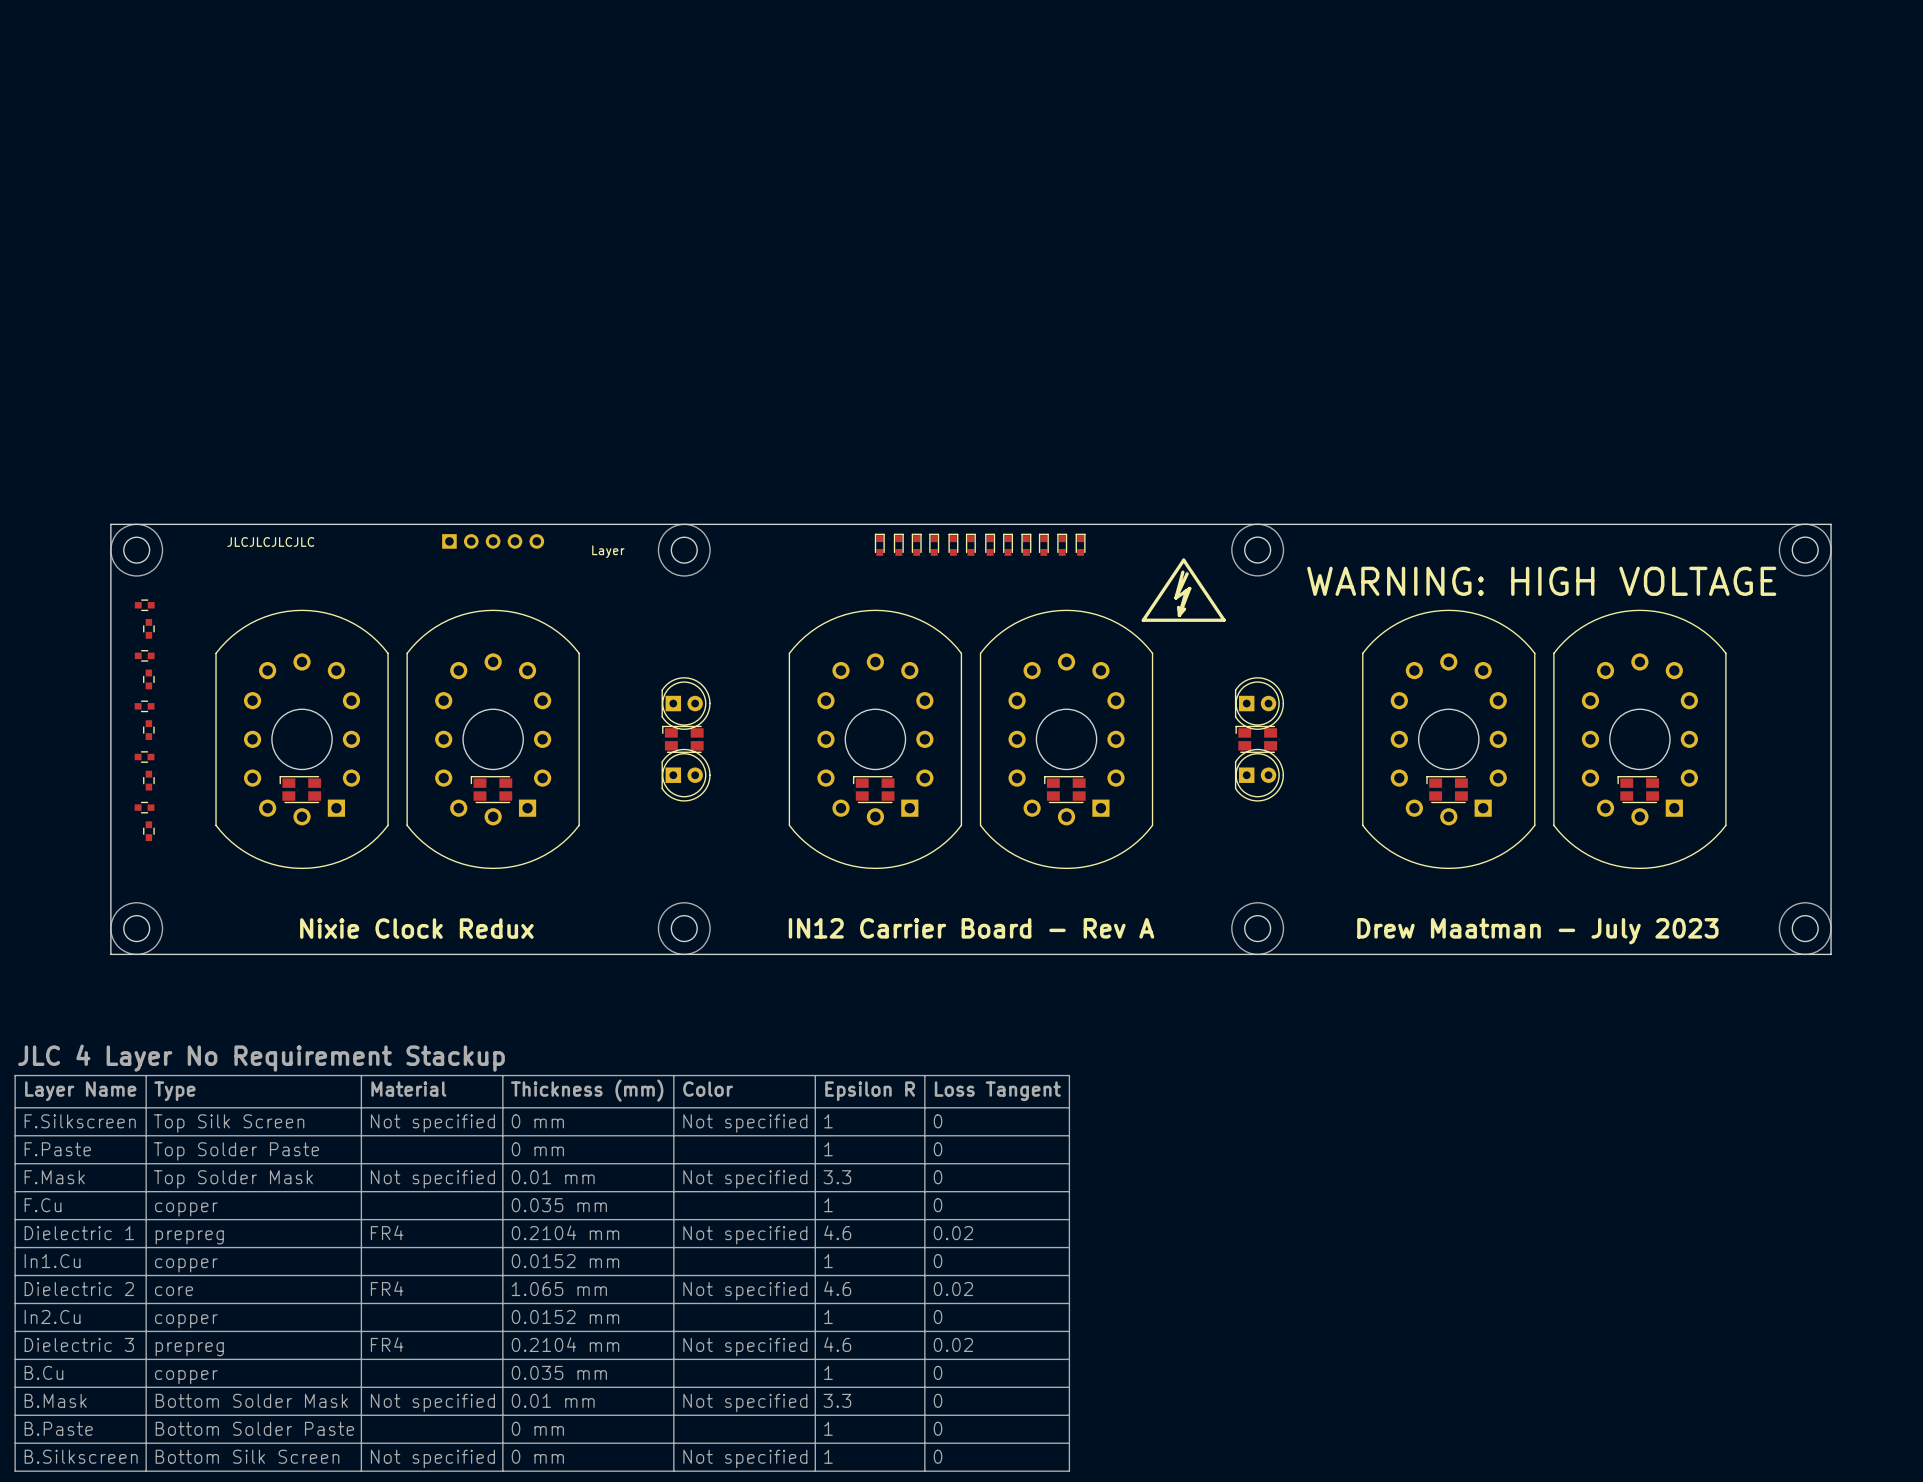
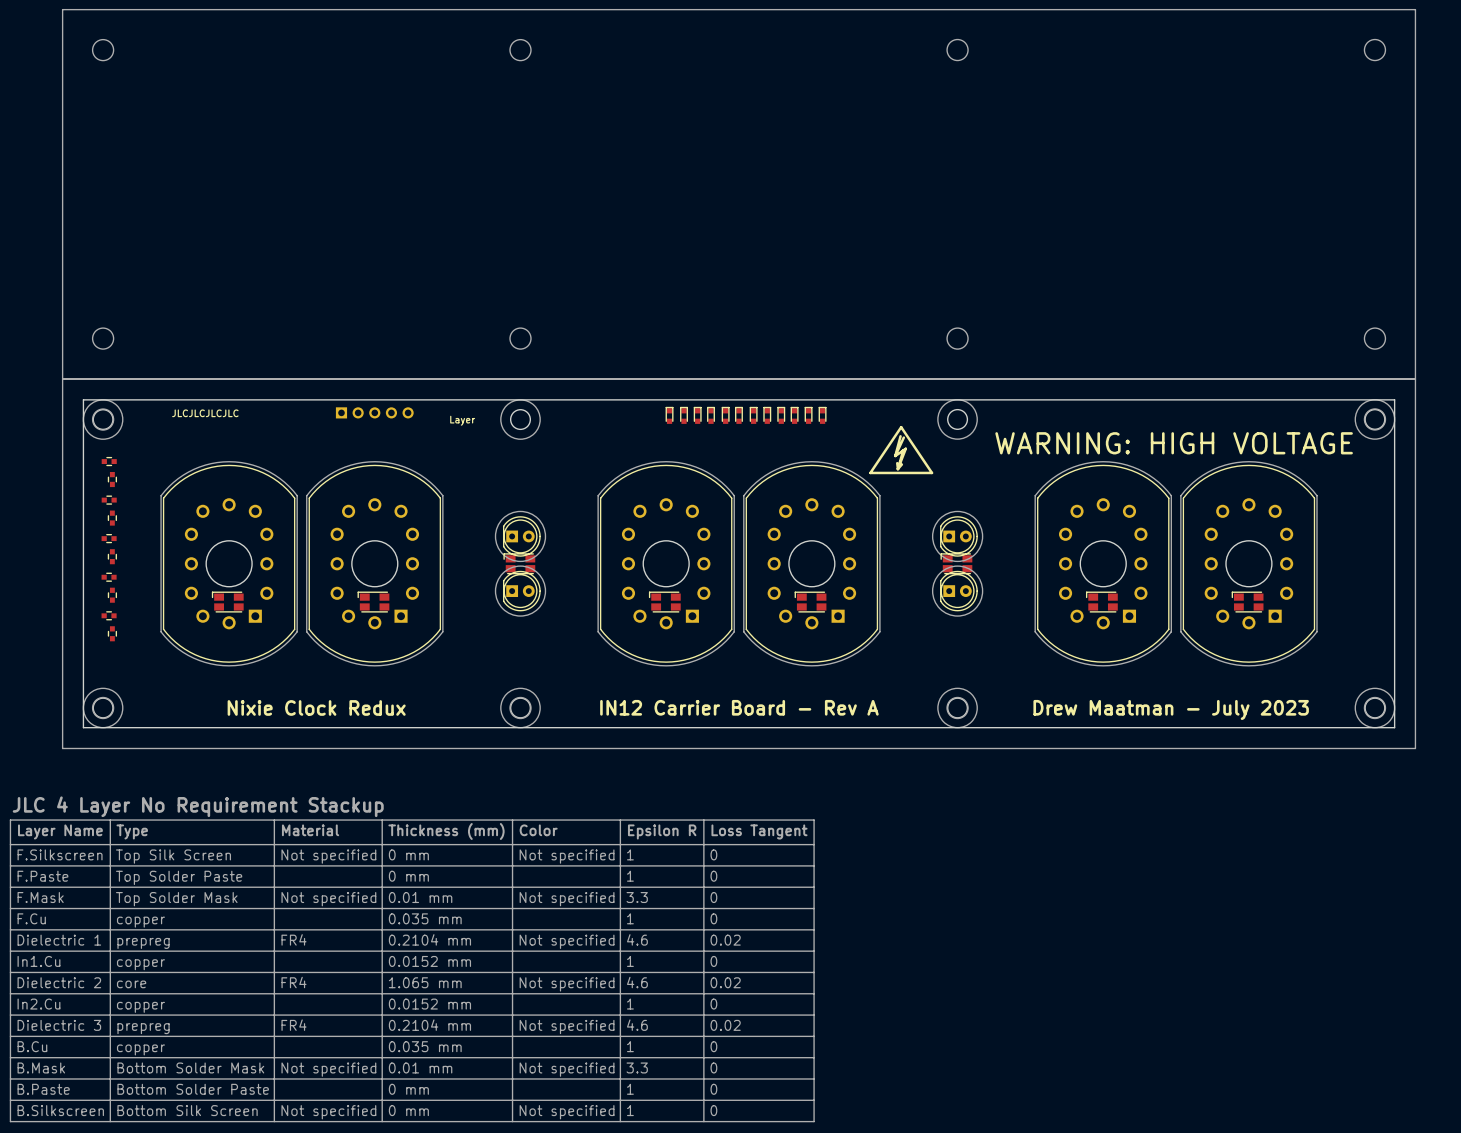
line: none -> (62, 9) (62, 748) (1415, 748) (1415, 9) (62, 9)
drawing: none -> [946, 39, 969, 62]
drawing: none -> [1363, 39, 1386, 62]
drawing: none -> [92, 39, 115, 62]
drawing: none -> [509, 39, 532, 62]
drawing: none -> [92, 327, 115, 350]
drawing: none -> [509, 327, 532, 350]
drawing: none -> [946, 327, 969, 350]
drawing: none -> [1363, 327, 1386, 350]
line: none -> (62, 379) (1415, 379)
drawing: none -> [92, 408, 115, 431]
drawing: none -> [1363, 408, 1386, 431]
drawing: none -> [160, 461, 298, 667]
drawing: none -> [306, 461, 444, 667]
drawing: none -> [597, 461, 735, 667]
drawing: none -> [743, 461, 881, 667]
drawing: none -> [1034, 461, 1172, 667]
drawing: none -> [1180, 461, 1318, 667]
drawing: none -> [495, 511, 546, 617]
drawing: none -> [932, 511, 983, 617]
drawing: none -> [92, 697, 115, 719]
drawing: none -> [509, 697, 532, 719]
drawing: none -> [946, 697, 969, 719]
drawing: none -> [1363, 697, 1386, 719]

